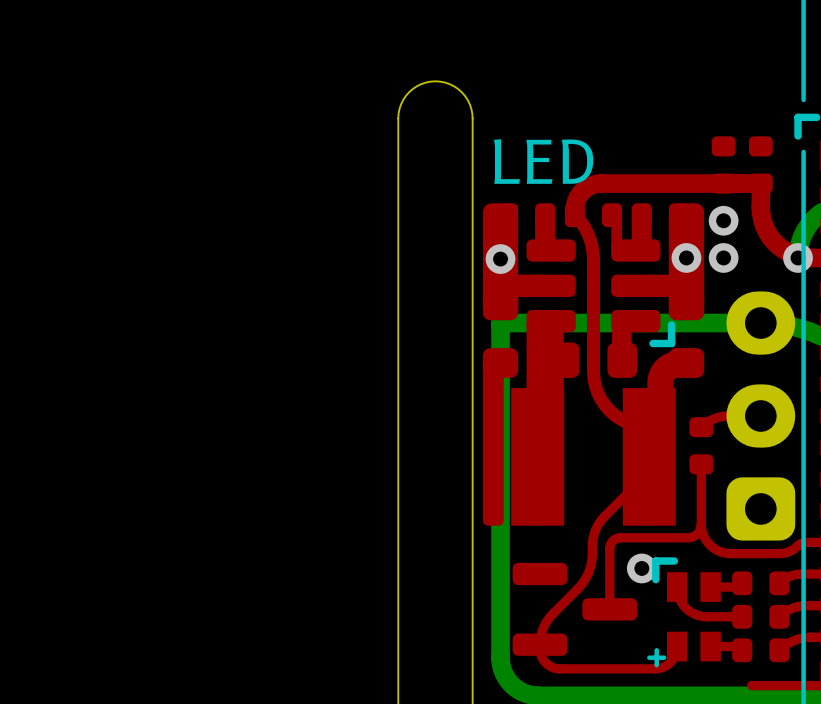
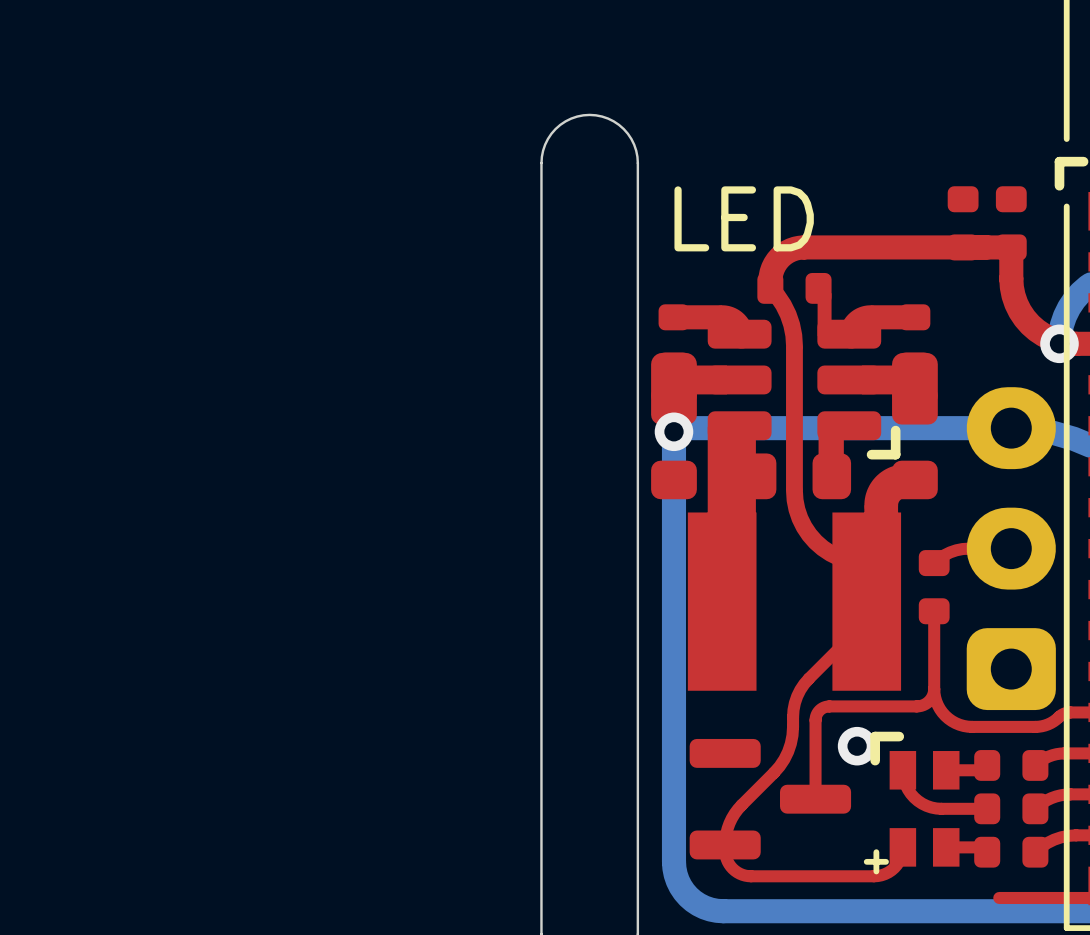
part footprint: [482, 203, 705, 526] -> [651, 272, 938, 691]
via: (723, 220) -> none
via: (686, 257) -> none
via: (723, 257) -> none
via position: (500, 259) -> (673, 431)

